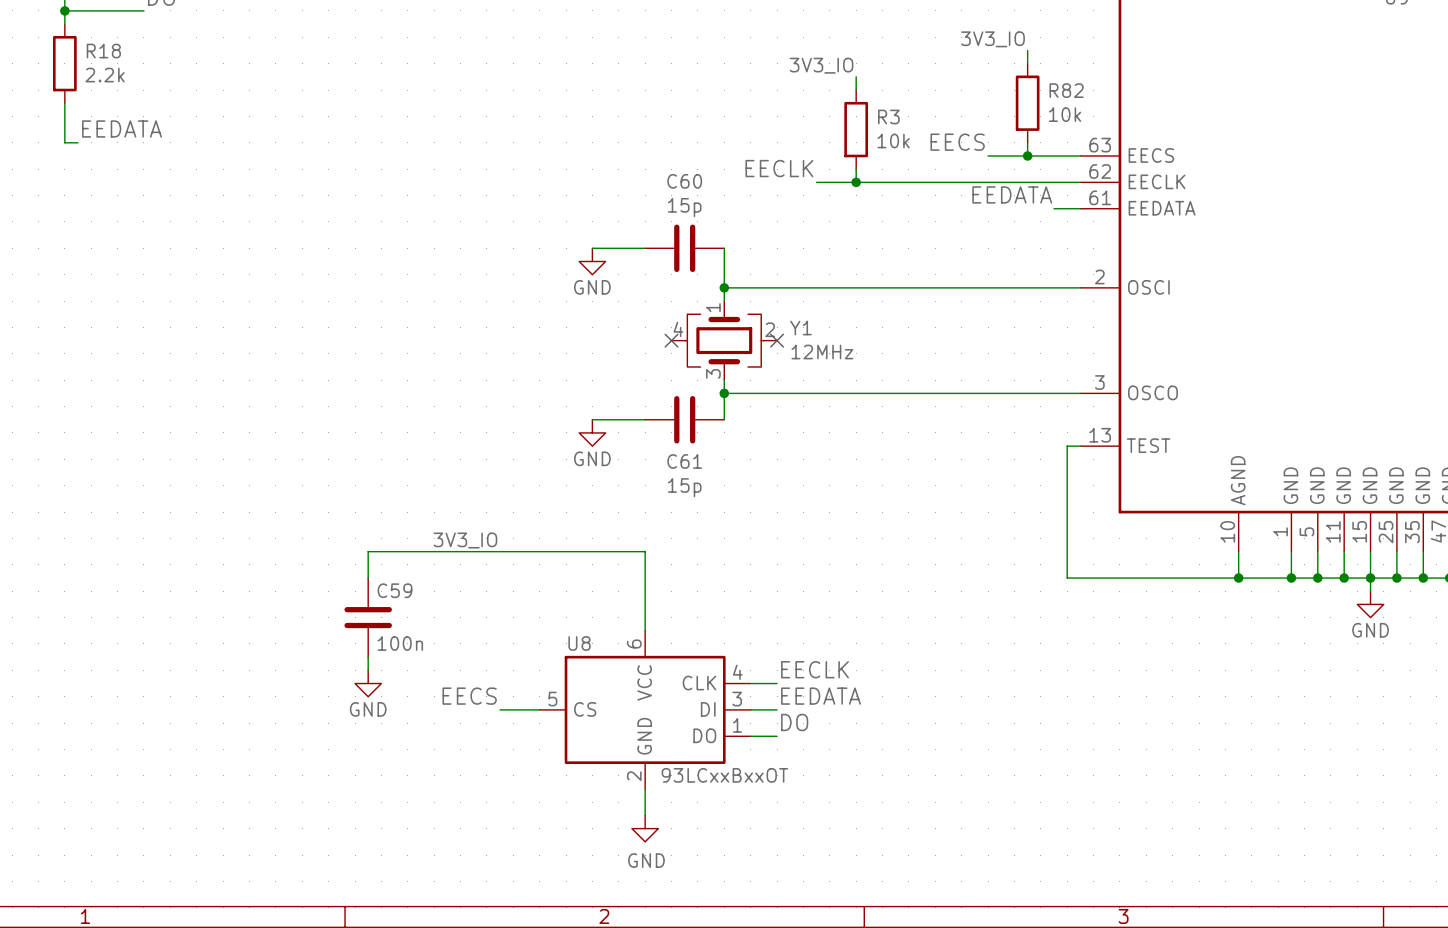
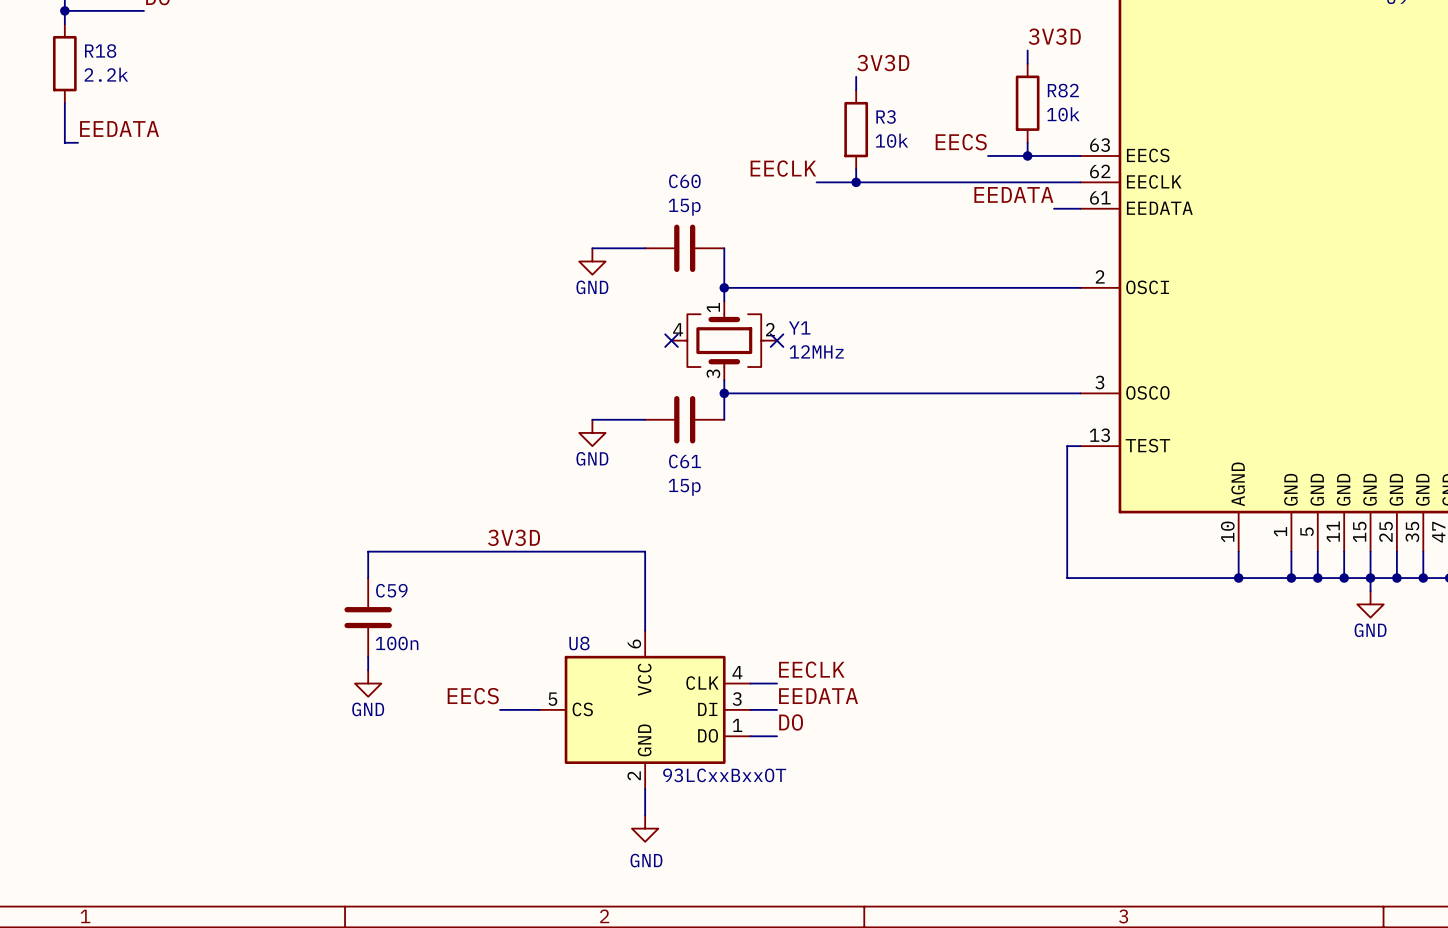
label: 3V3_IO (992, 39) -> 3V3D (1054, 36)
label: 3V3_IO (821, 65) -> 3V3D (883, 63)
label: none -> 3V3D (514, 537)
label: 3V3_IO (465, 540) -> none

